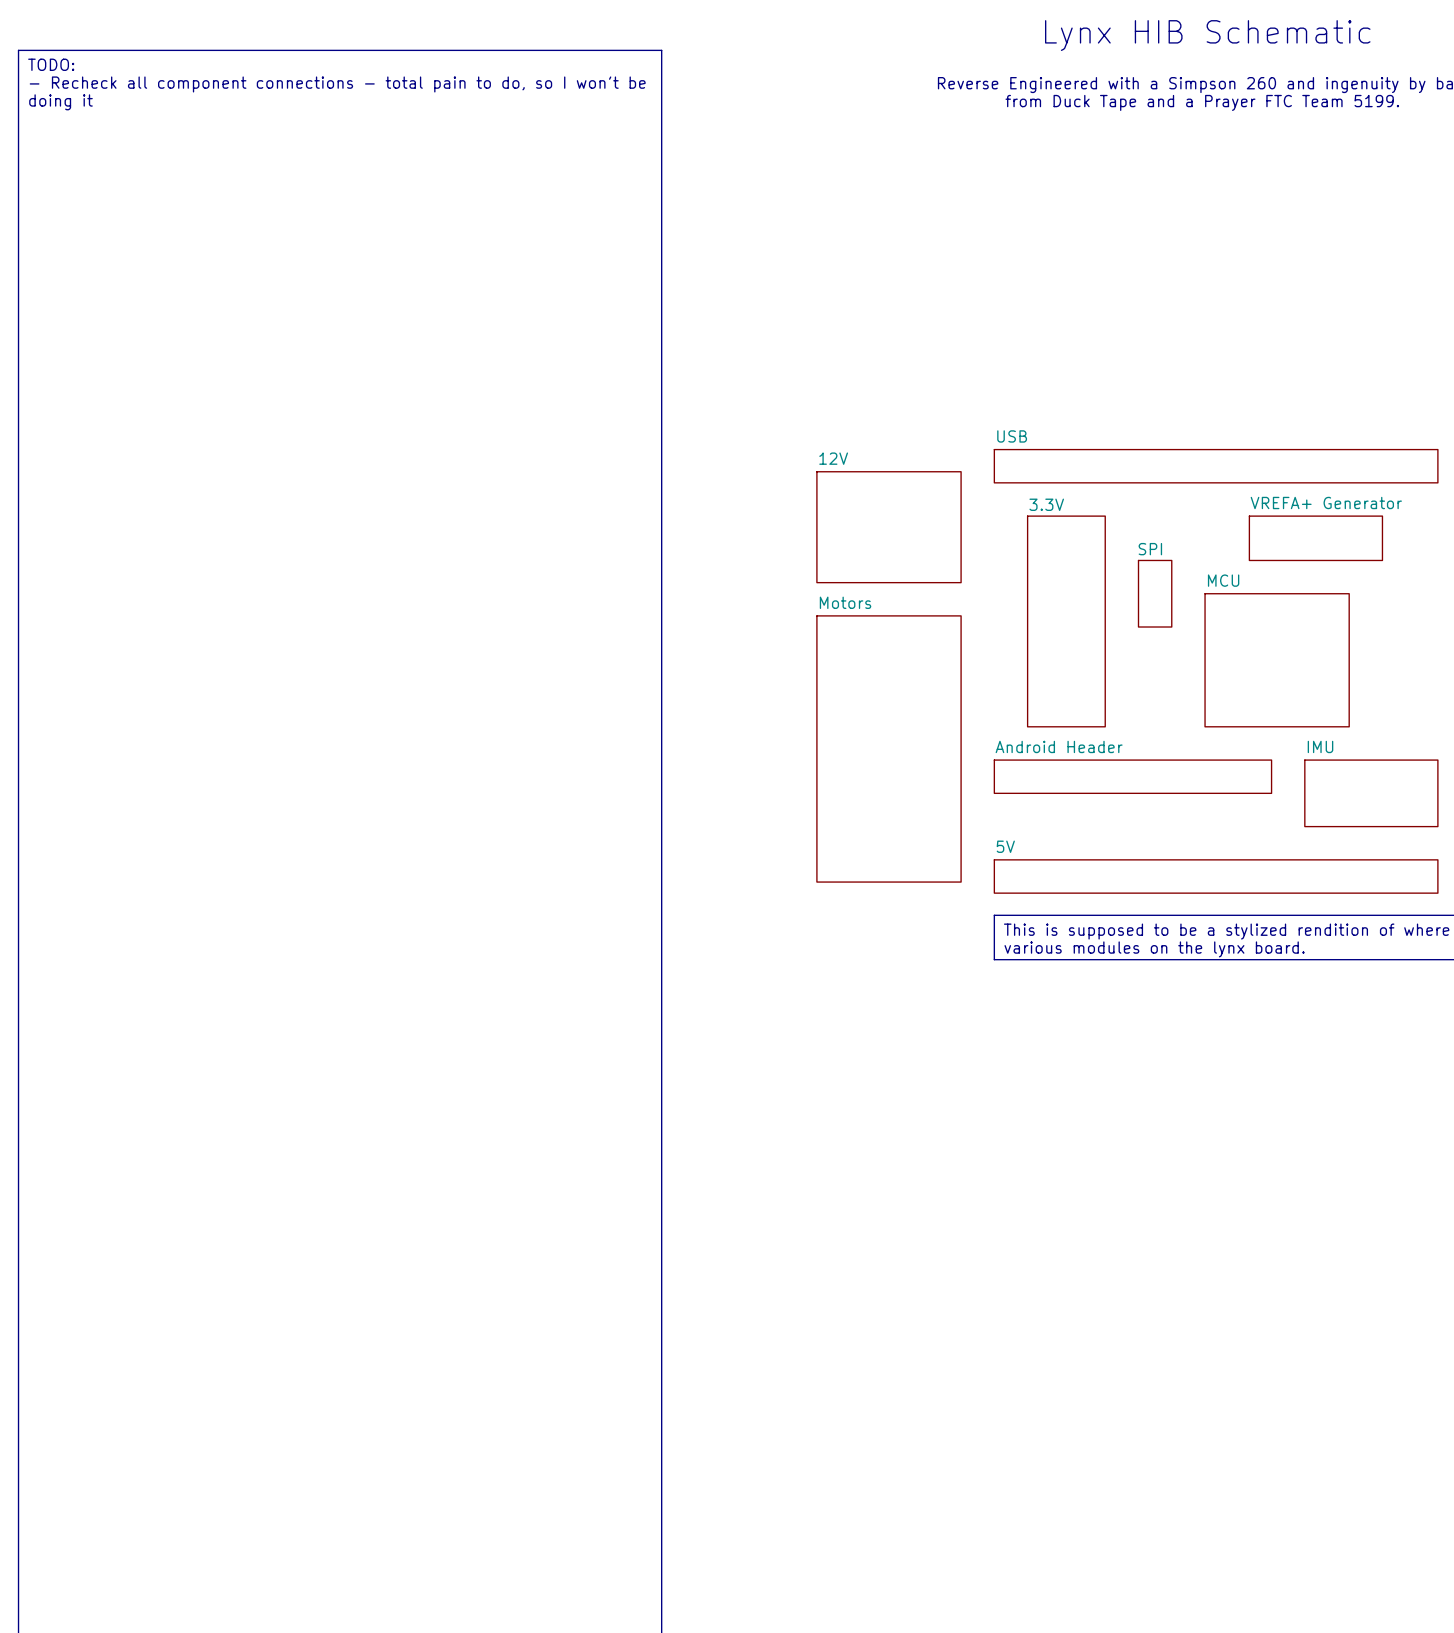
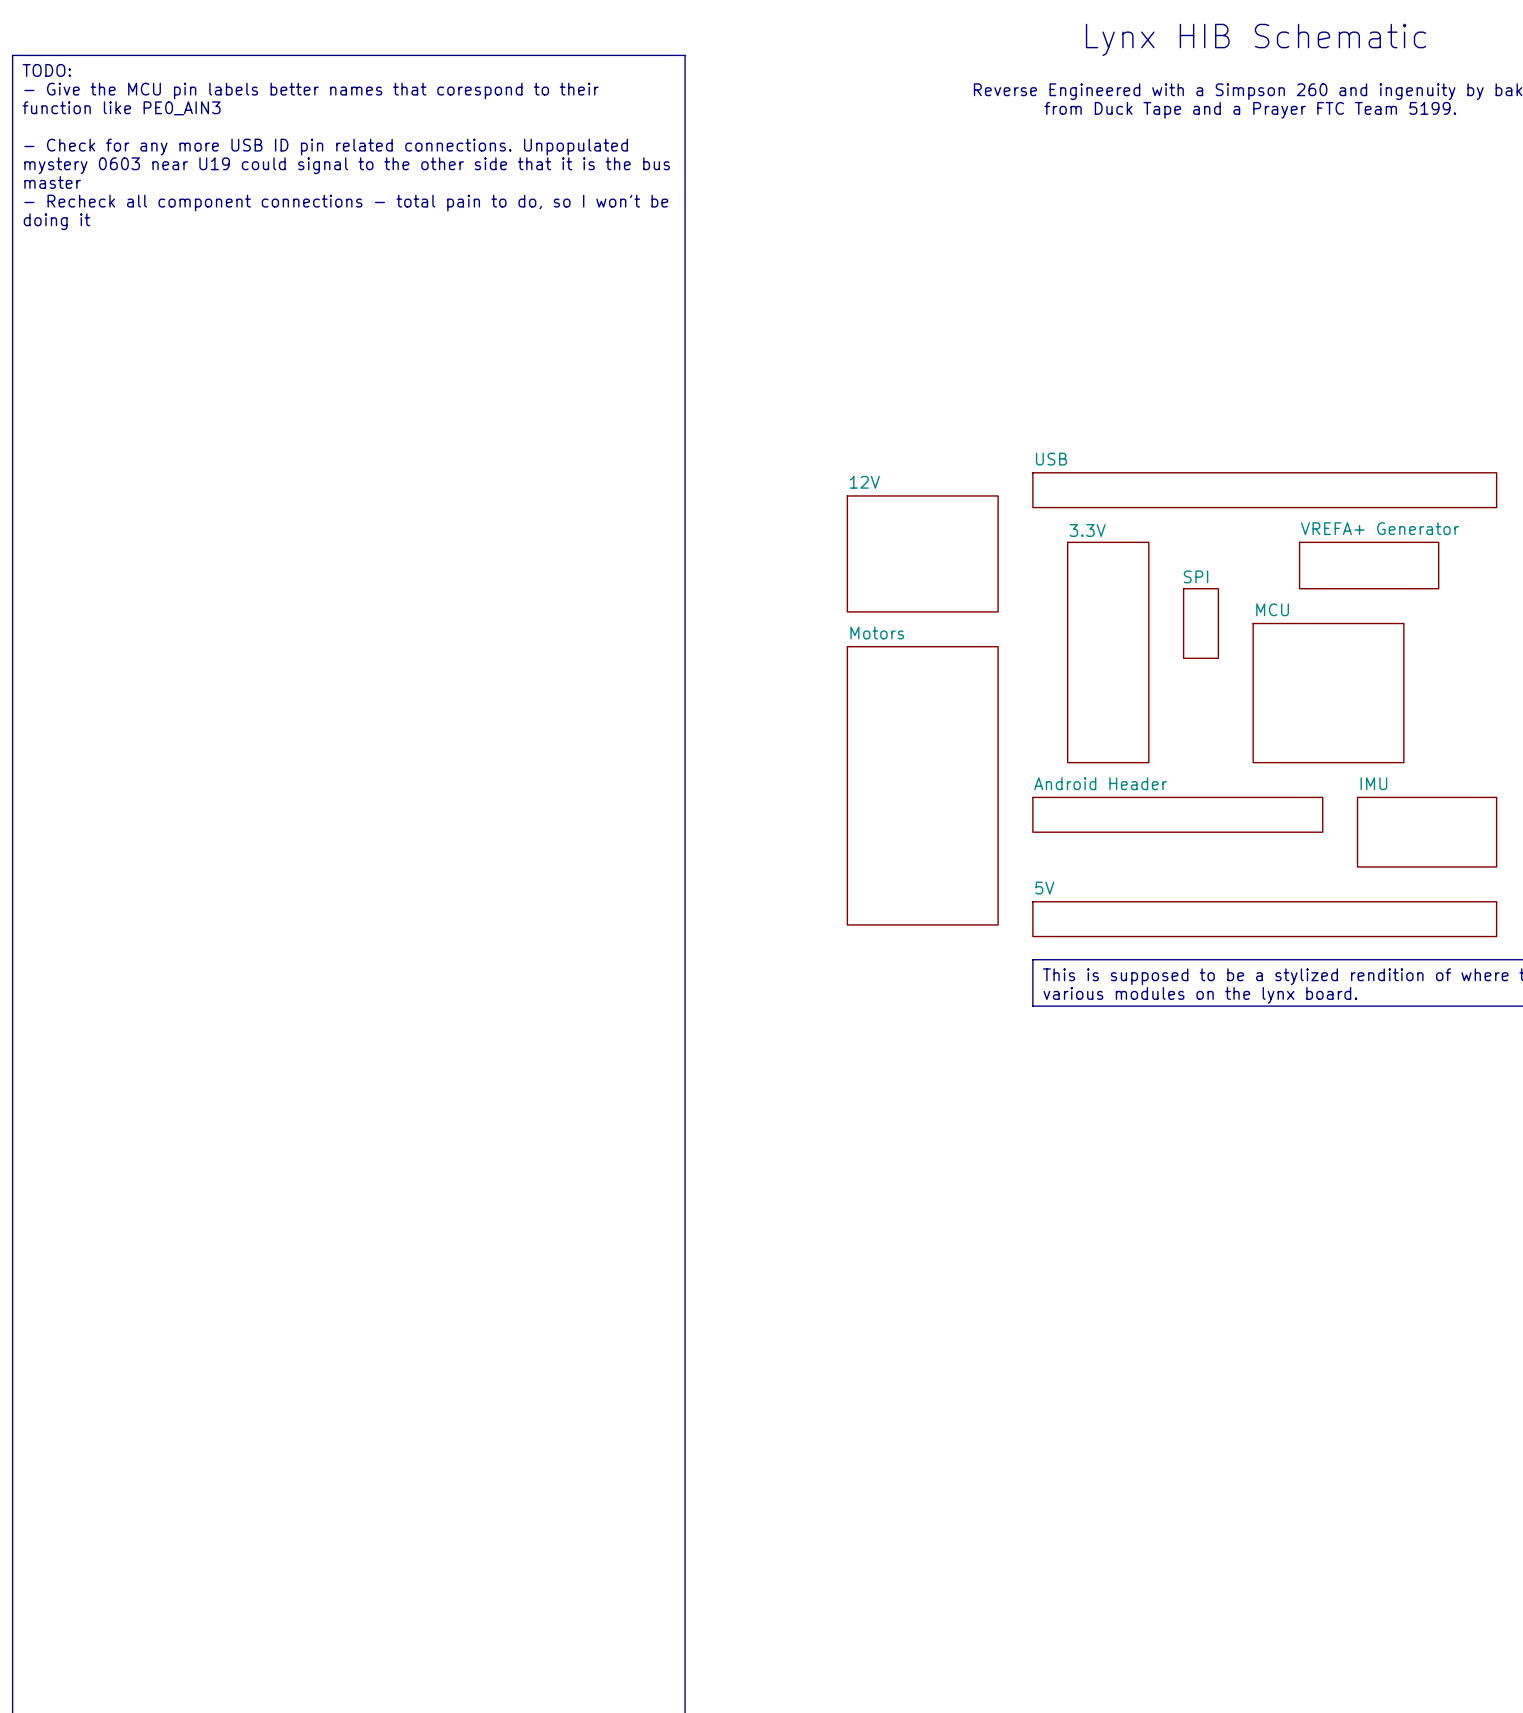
text: - Recheck all component connections - total pain to do, so I won't be (337, 84) -> - Give the MCU pin labels better names that corespond to their (311, 91)
text: doing it (60, 102) -> function like PE0_AIN3 (121, 108)
text: none -> - Check for any more USB ID pin related connections. Unpopulated (326, 147)
text: none -> mystery 0603 near U19 could signal to the other side that it is the bus (347, 165)
text: none -> master (52, 182)
text: none -> - Recheck all component connections - total pain to do, so I won't be (346, 203)
text: none -> doing it (57, 221)

